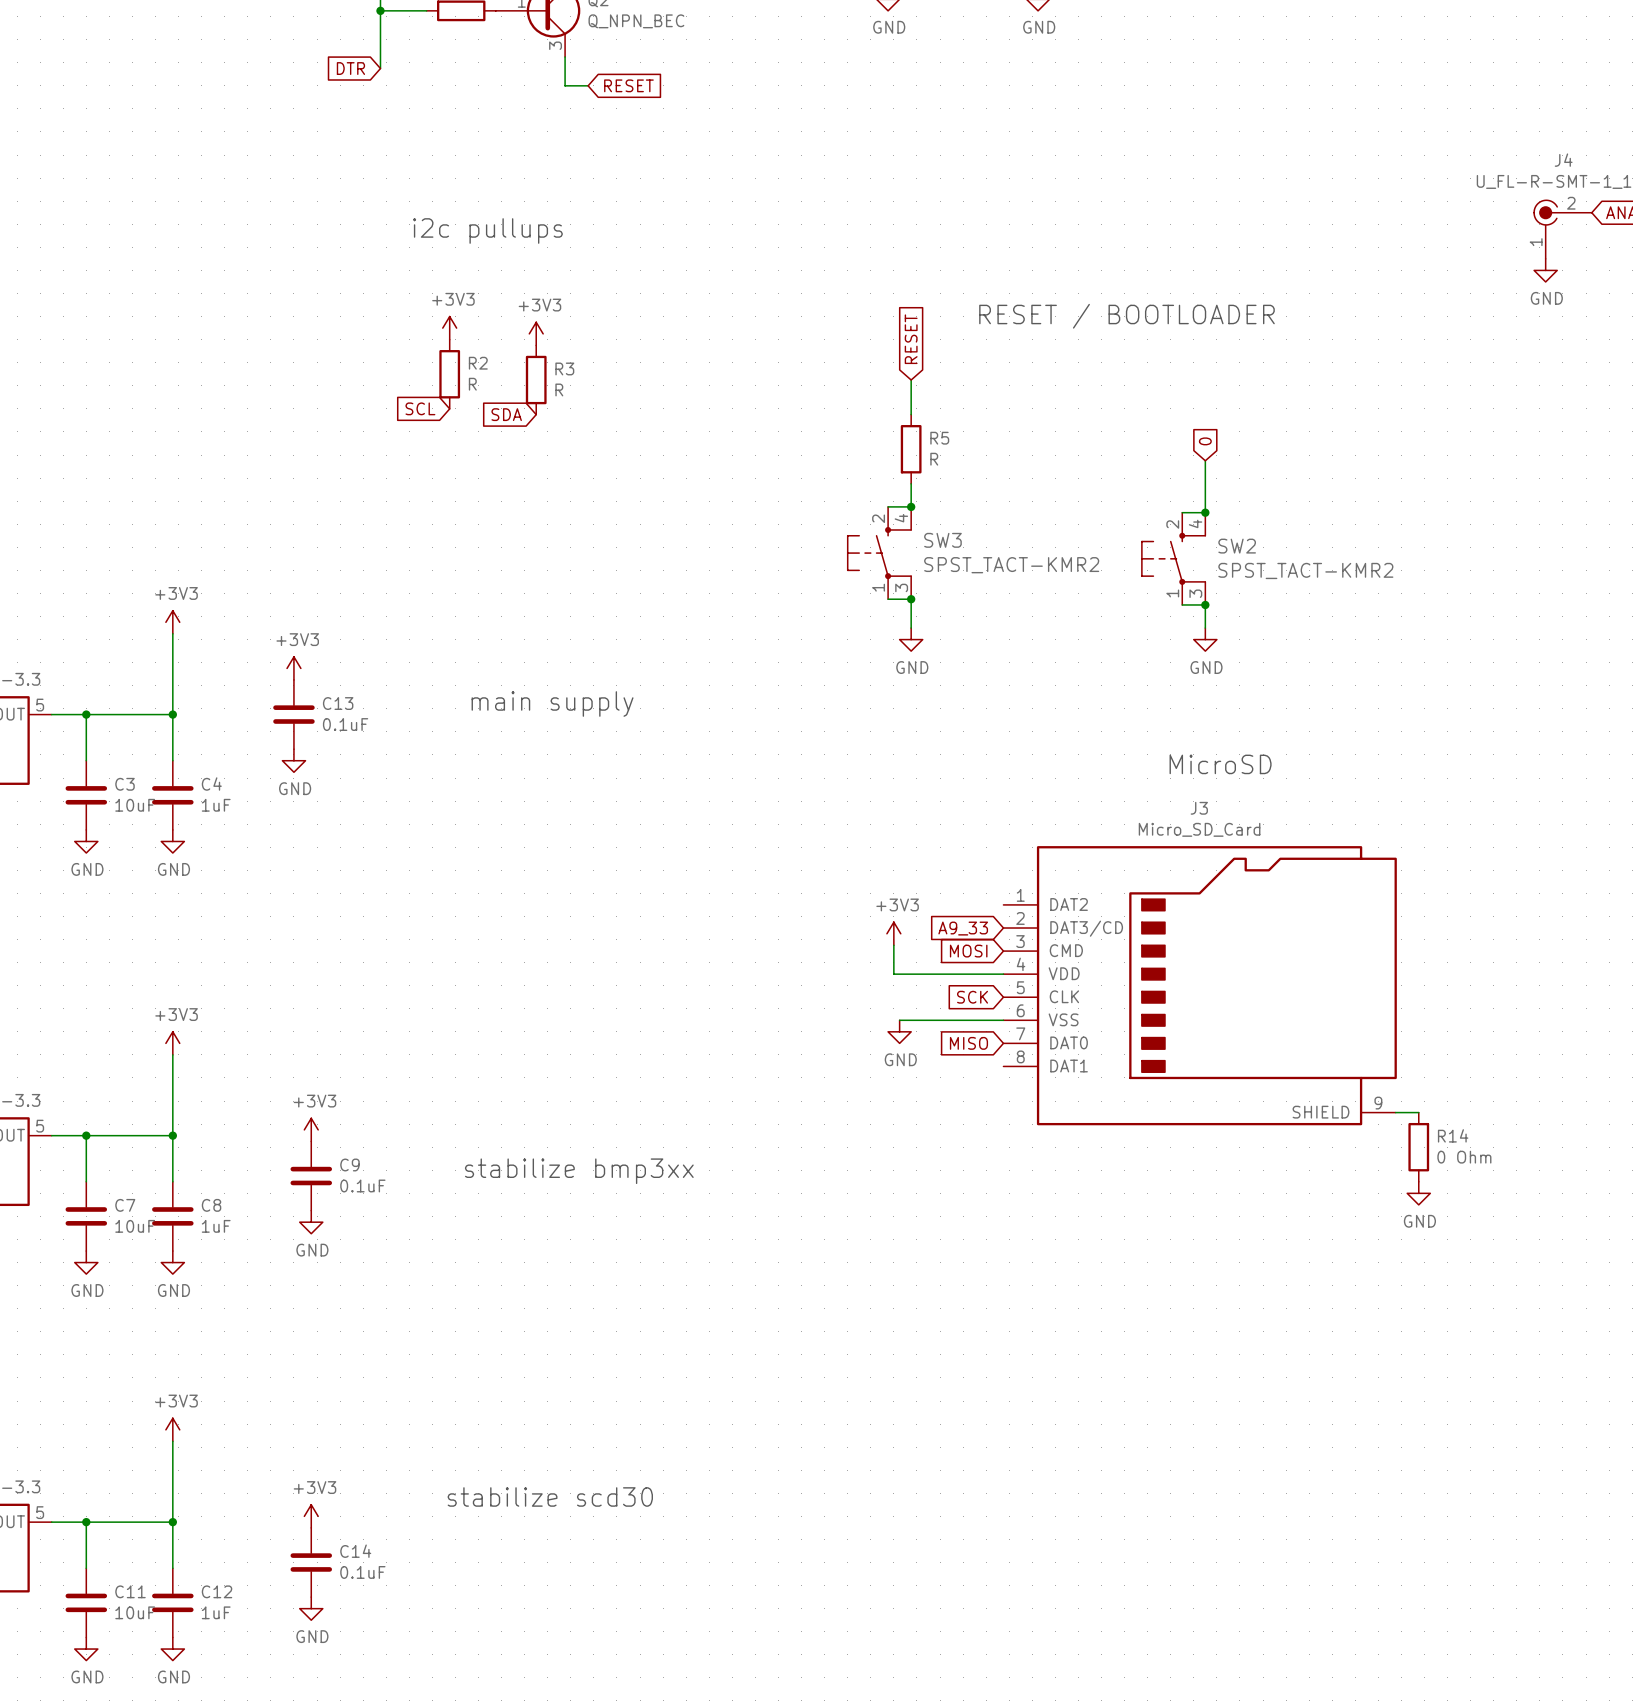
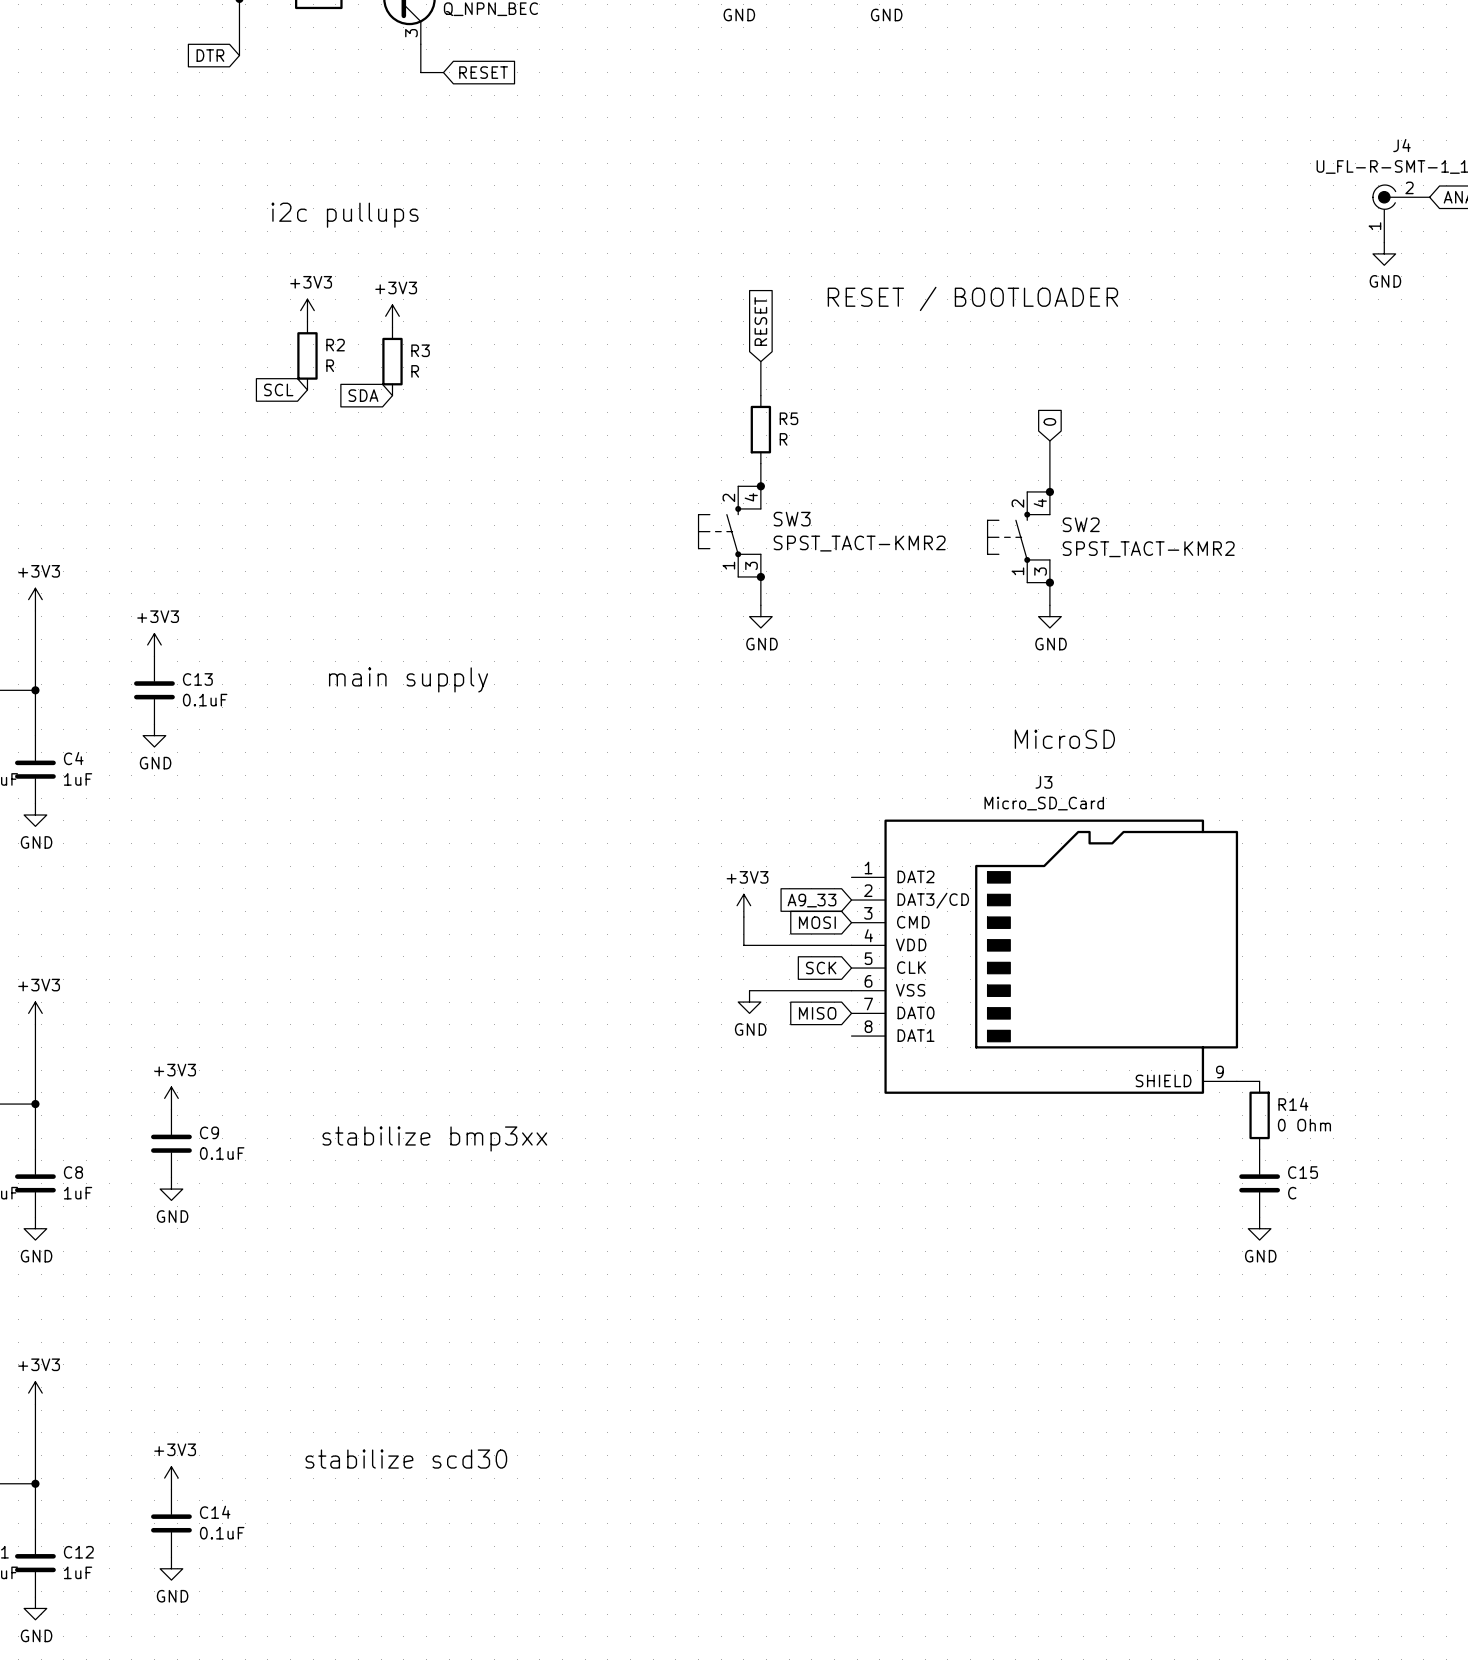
power symbol position: GND (1418, 1193) -> GND (1259, 1228)
C15: none -> C (1259, 1183)

